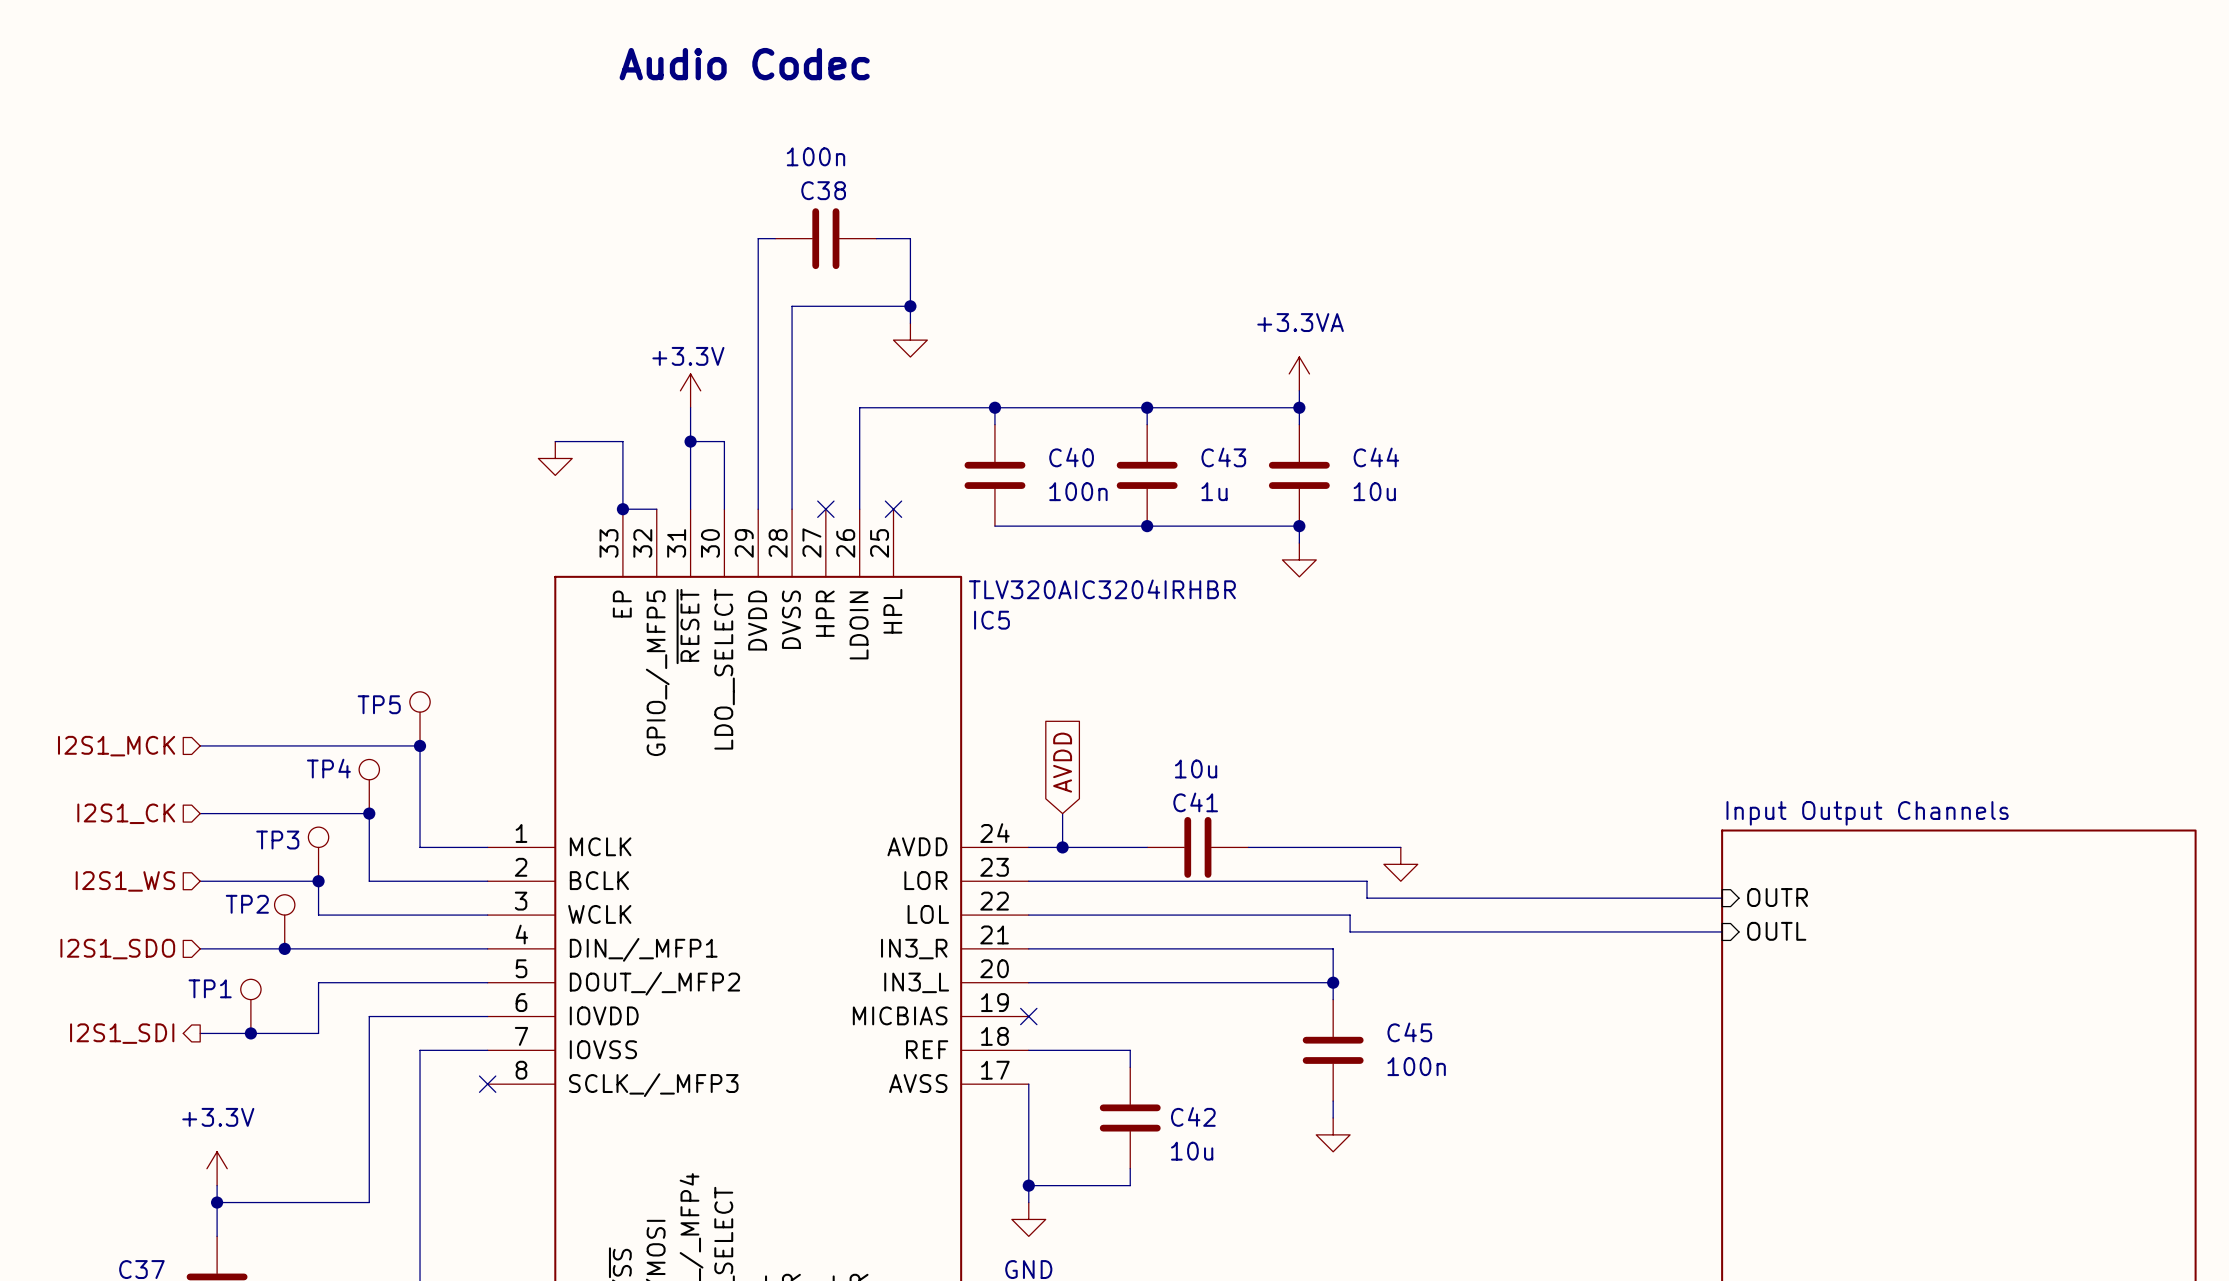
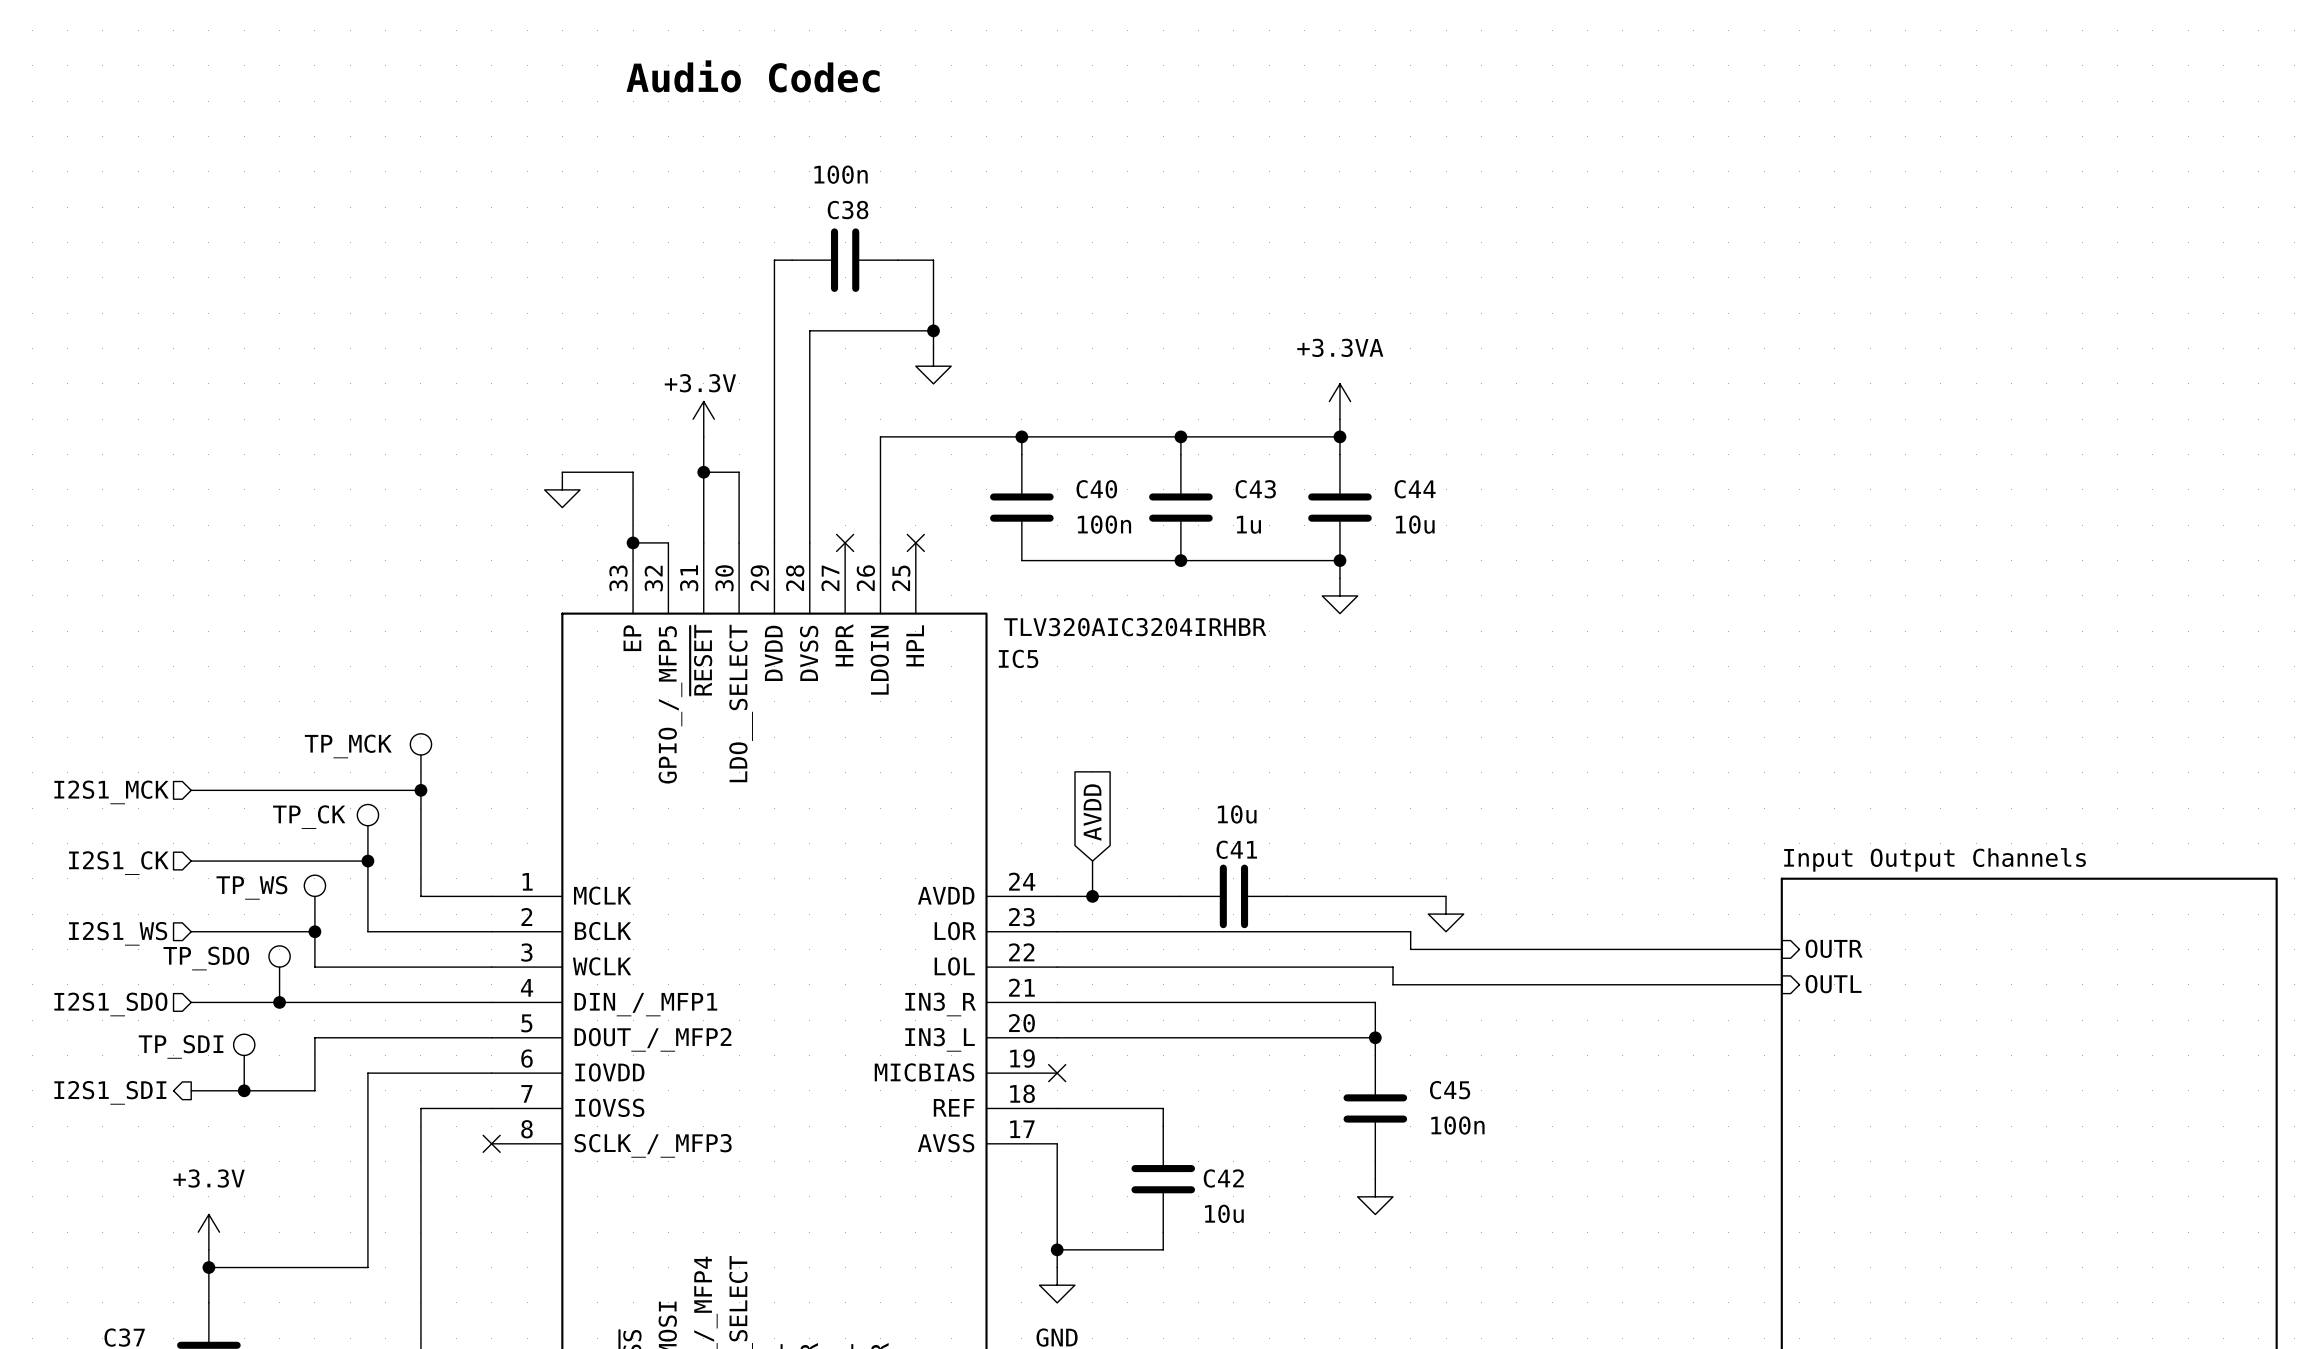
TP5 name: TP5 (379, 704) -> TP_MCK (348, 746)
TP4 name: TP4 (328, 768) -> TP_CK (309, 817)
TP3 name: TP3 (277, 840) -> TP_WS (251, 887)
TP2 name: TP2 (247, 904) -> TP_SDO (206, 958)
TP1 name: TP1 (210, 988) -> TP_SDI (181, 1046)

